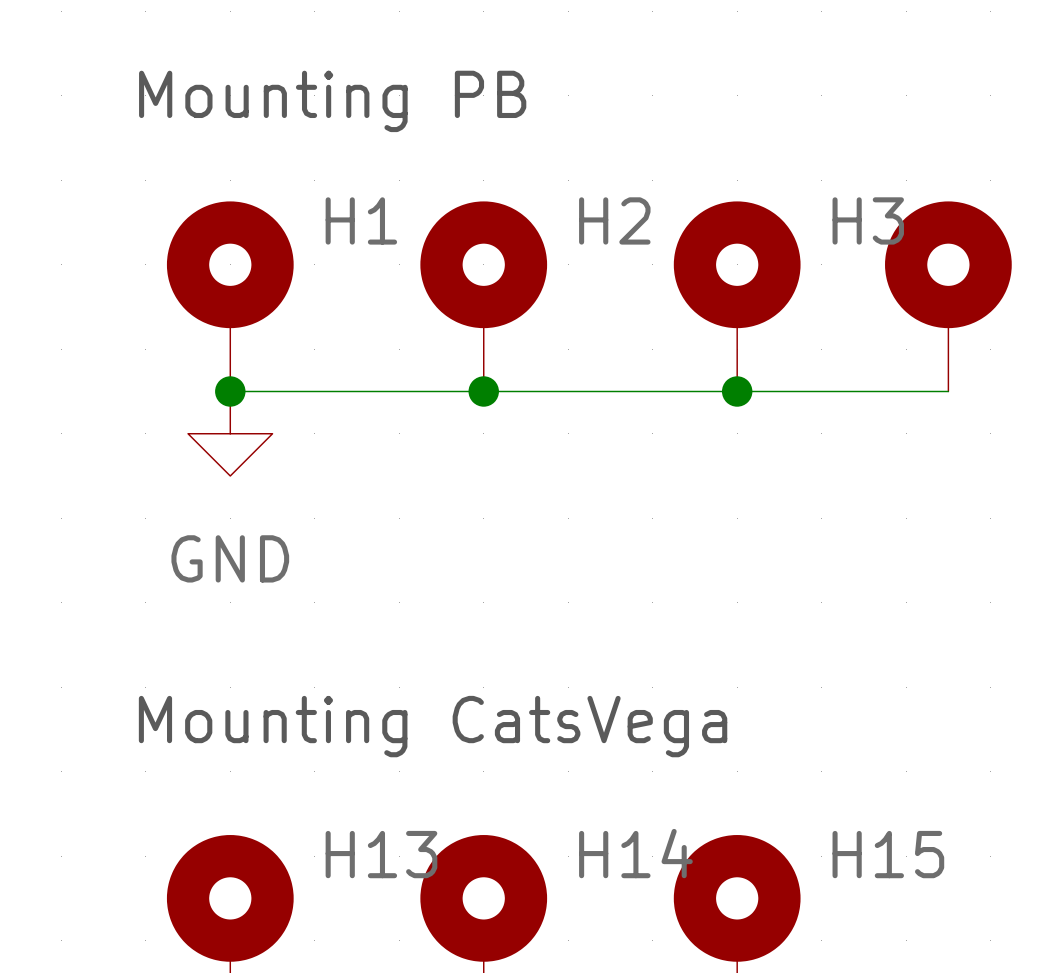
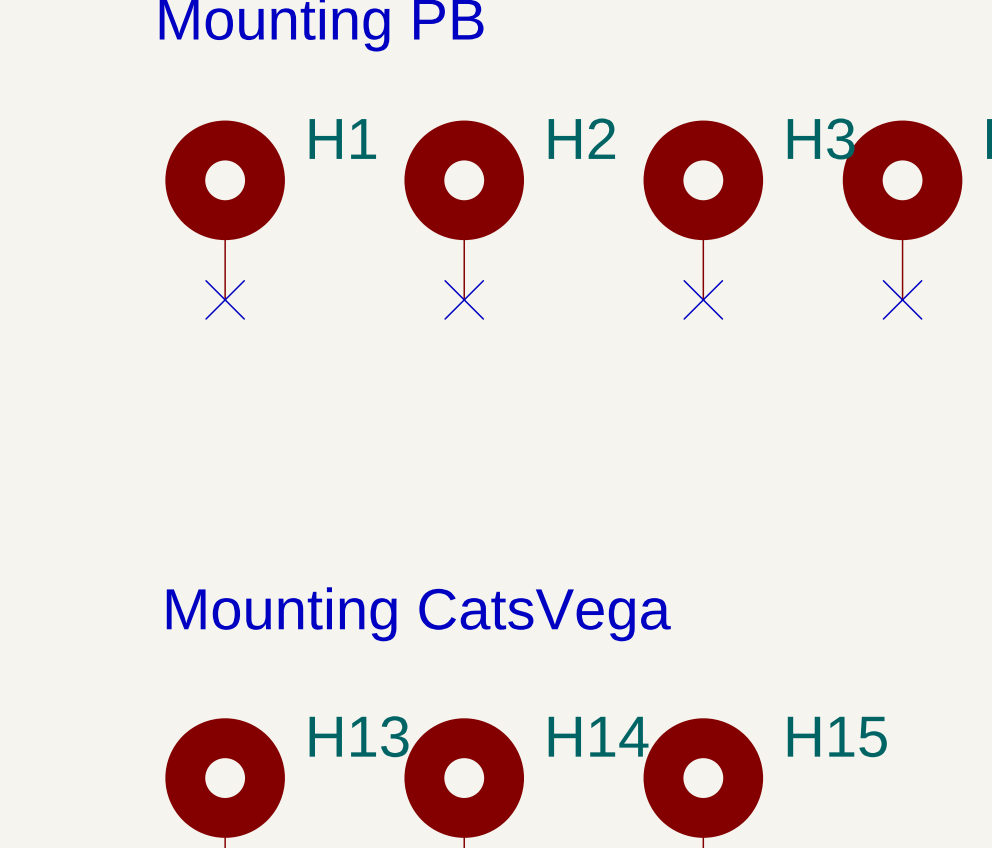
wire: (230, 391) (948, 391) -> none
junction: (230, 391) -> none
no-connect mark: none -> (225, 299)
junction: (483, 391) -> none
no-connect mark: none -> (464, 299)
junction: (737, 391) -> none
no-connect mark: none -> (703, 299)
no-connect mark: none -> (902, 299)
power symbol: GND (230, 433) -> none

